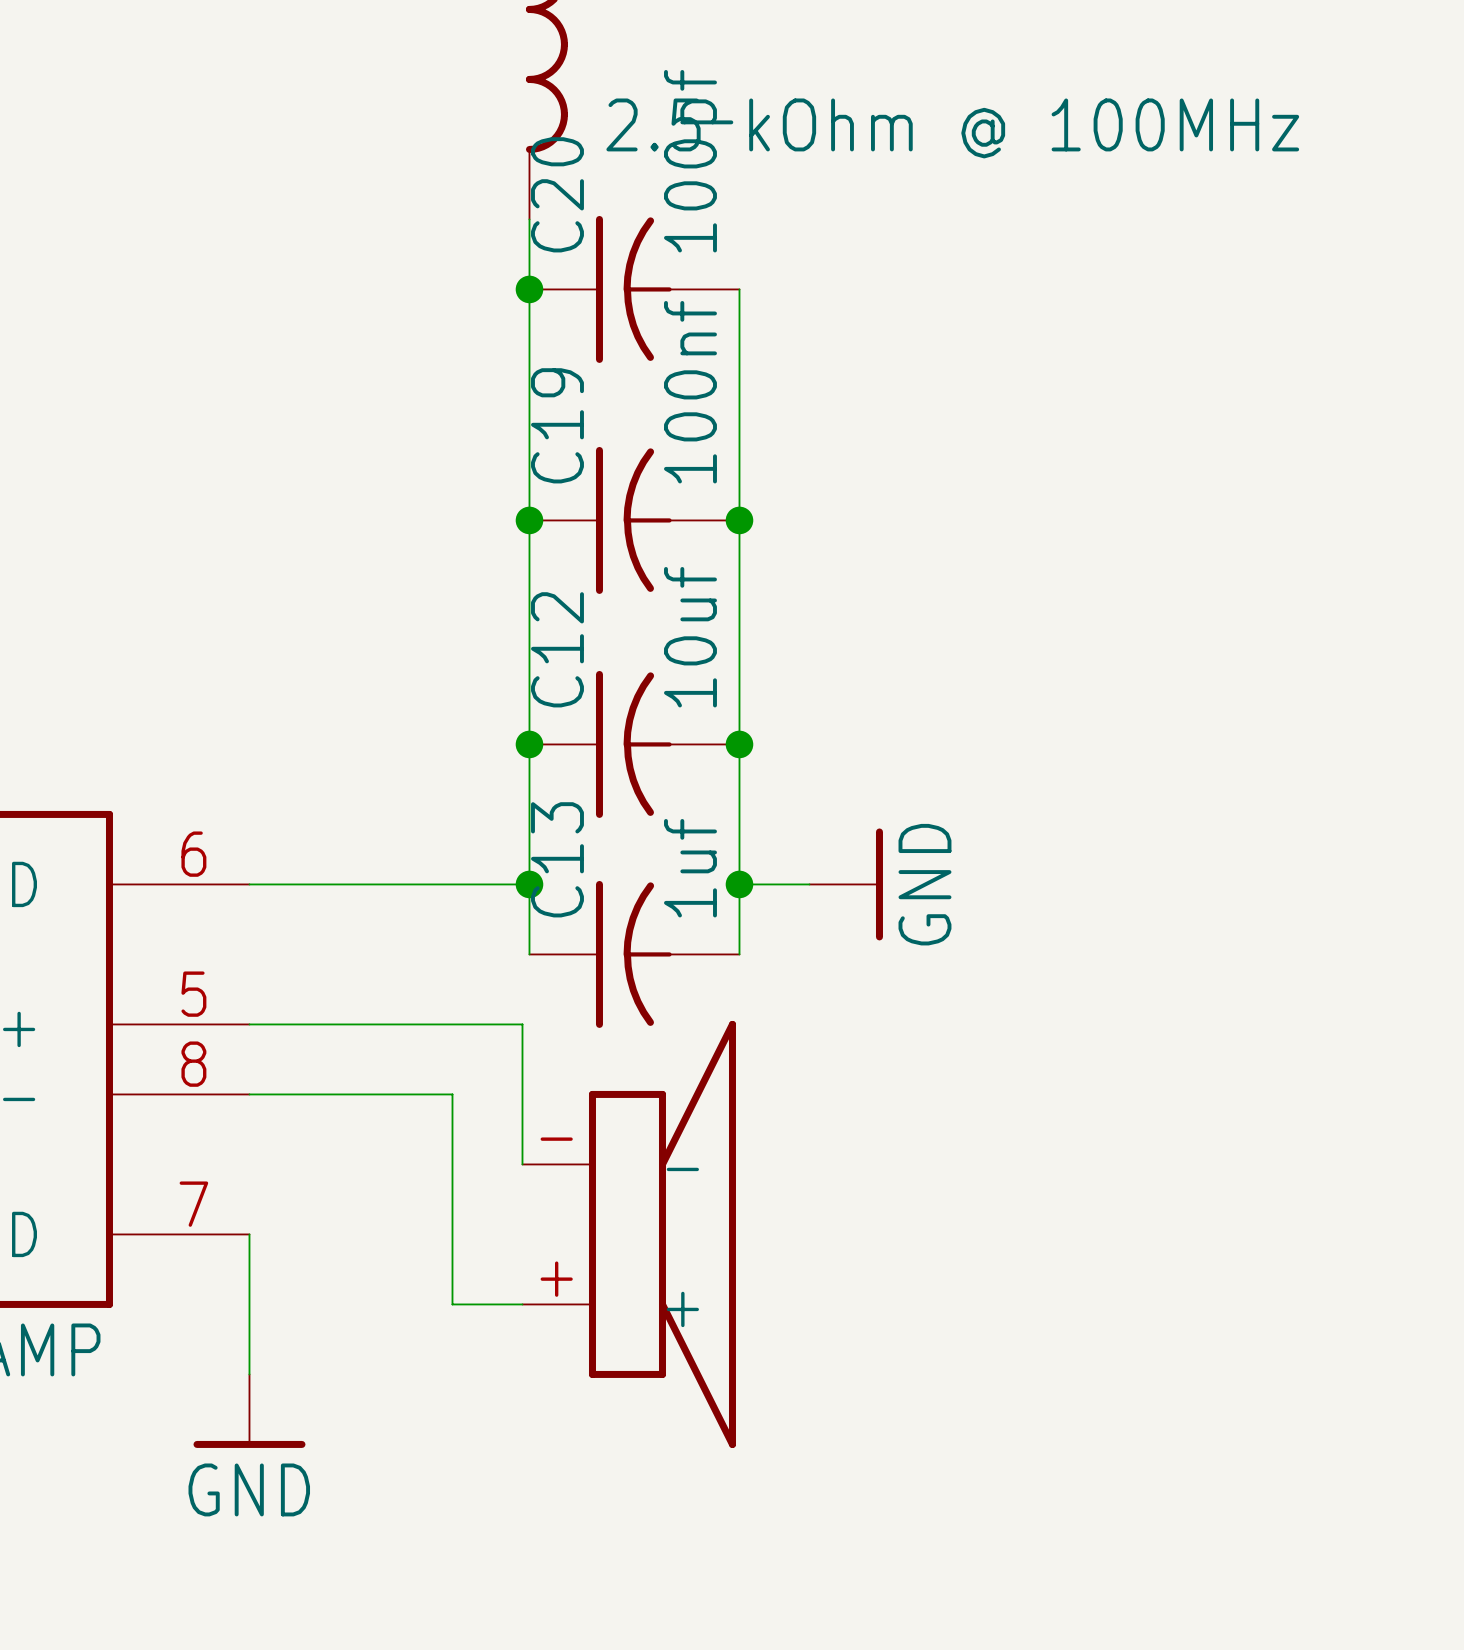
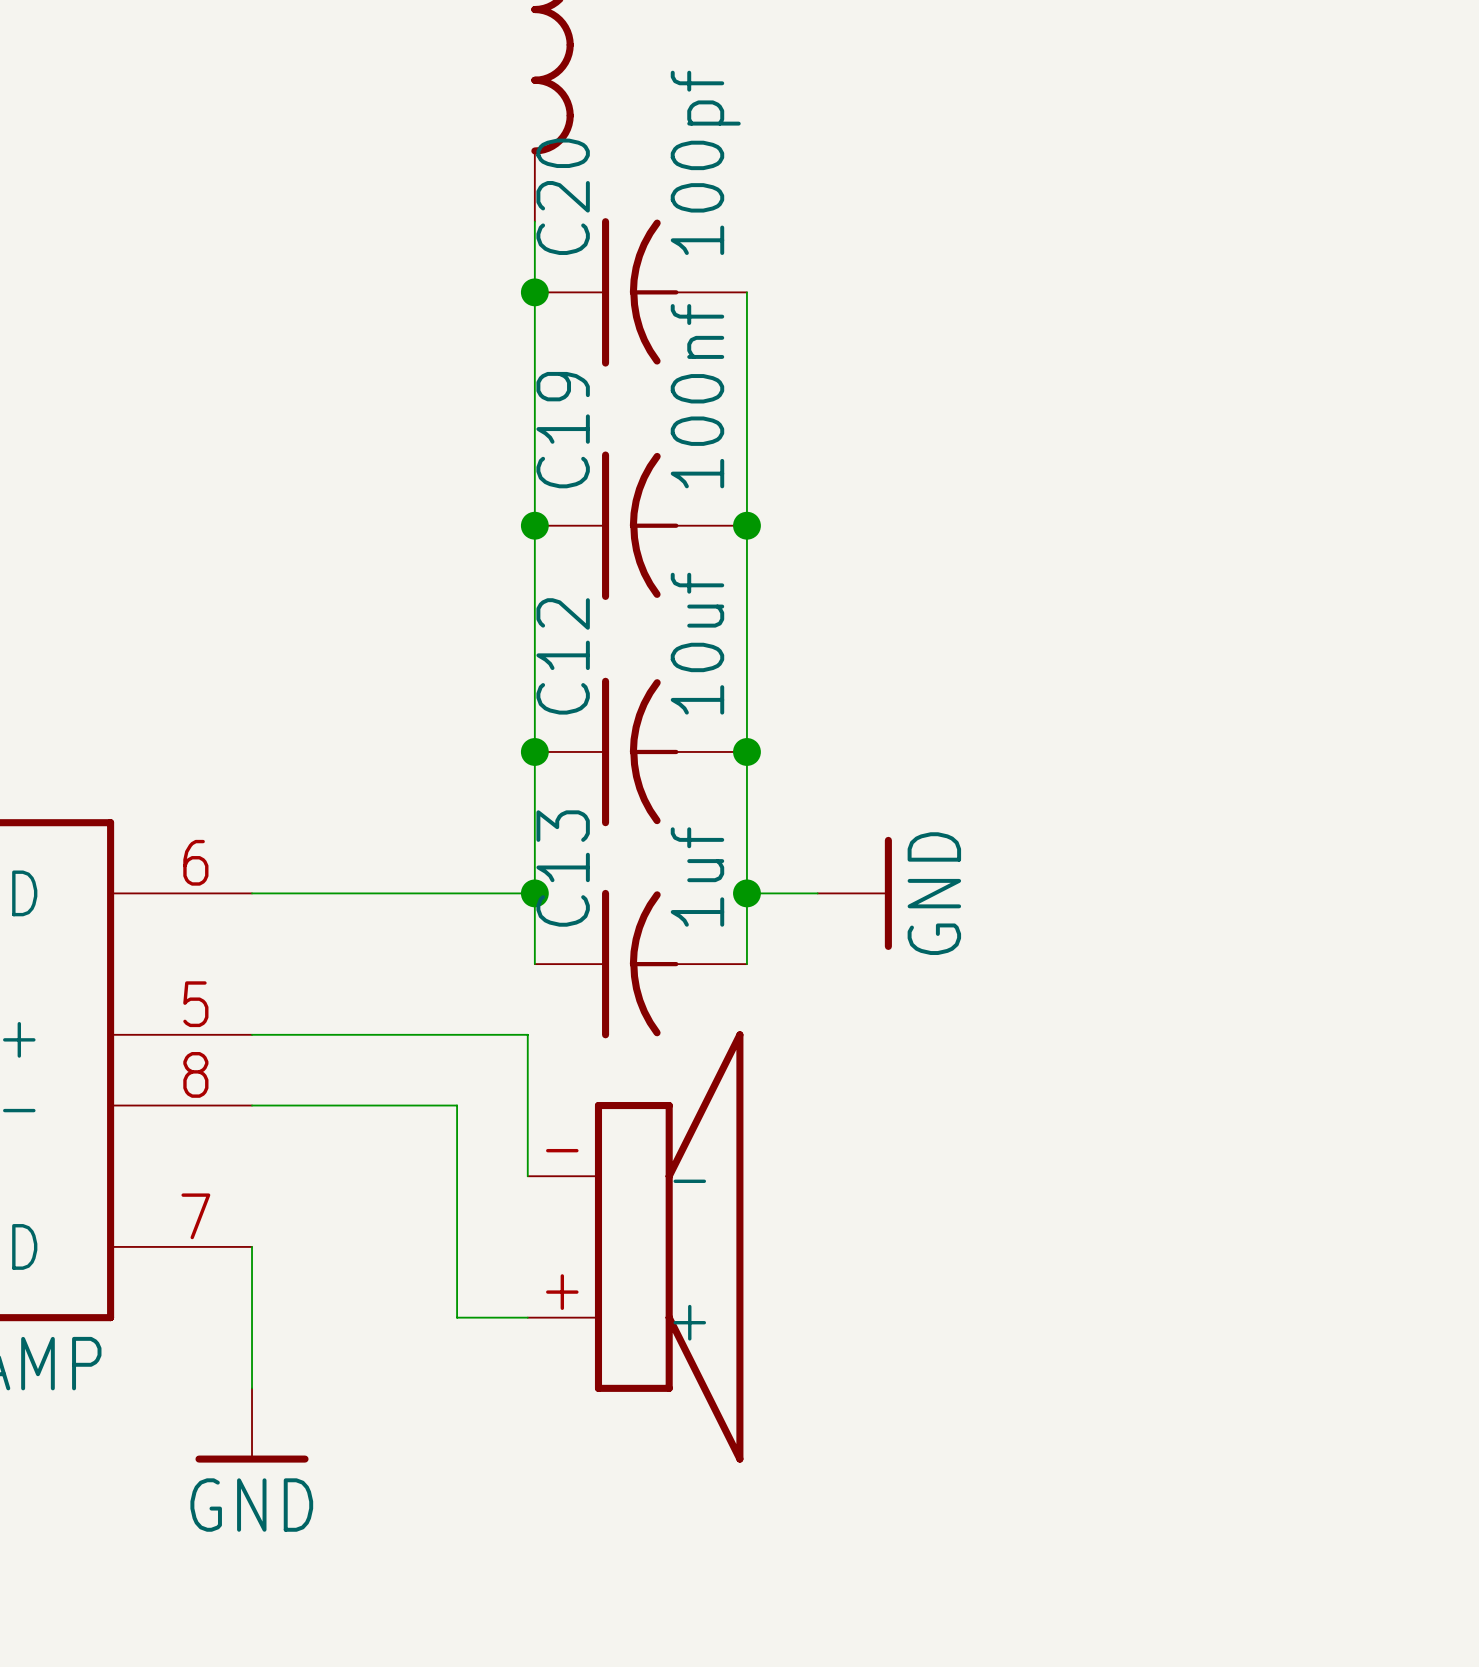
part value: 2.5 kOhm @ 100MHz (952, 128) -> none

